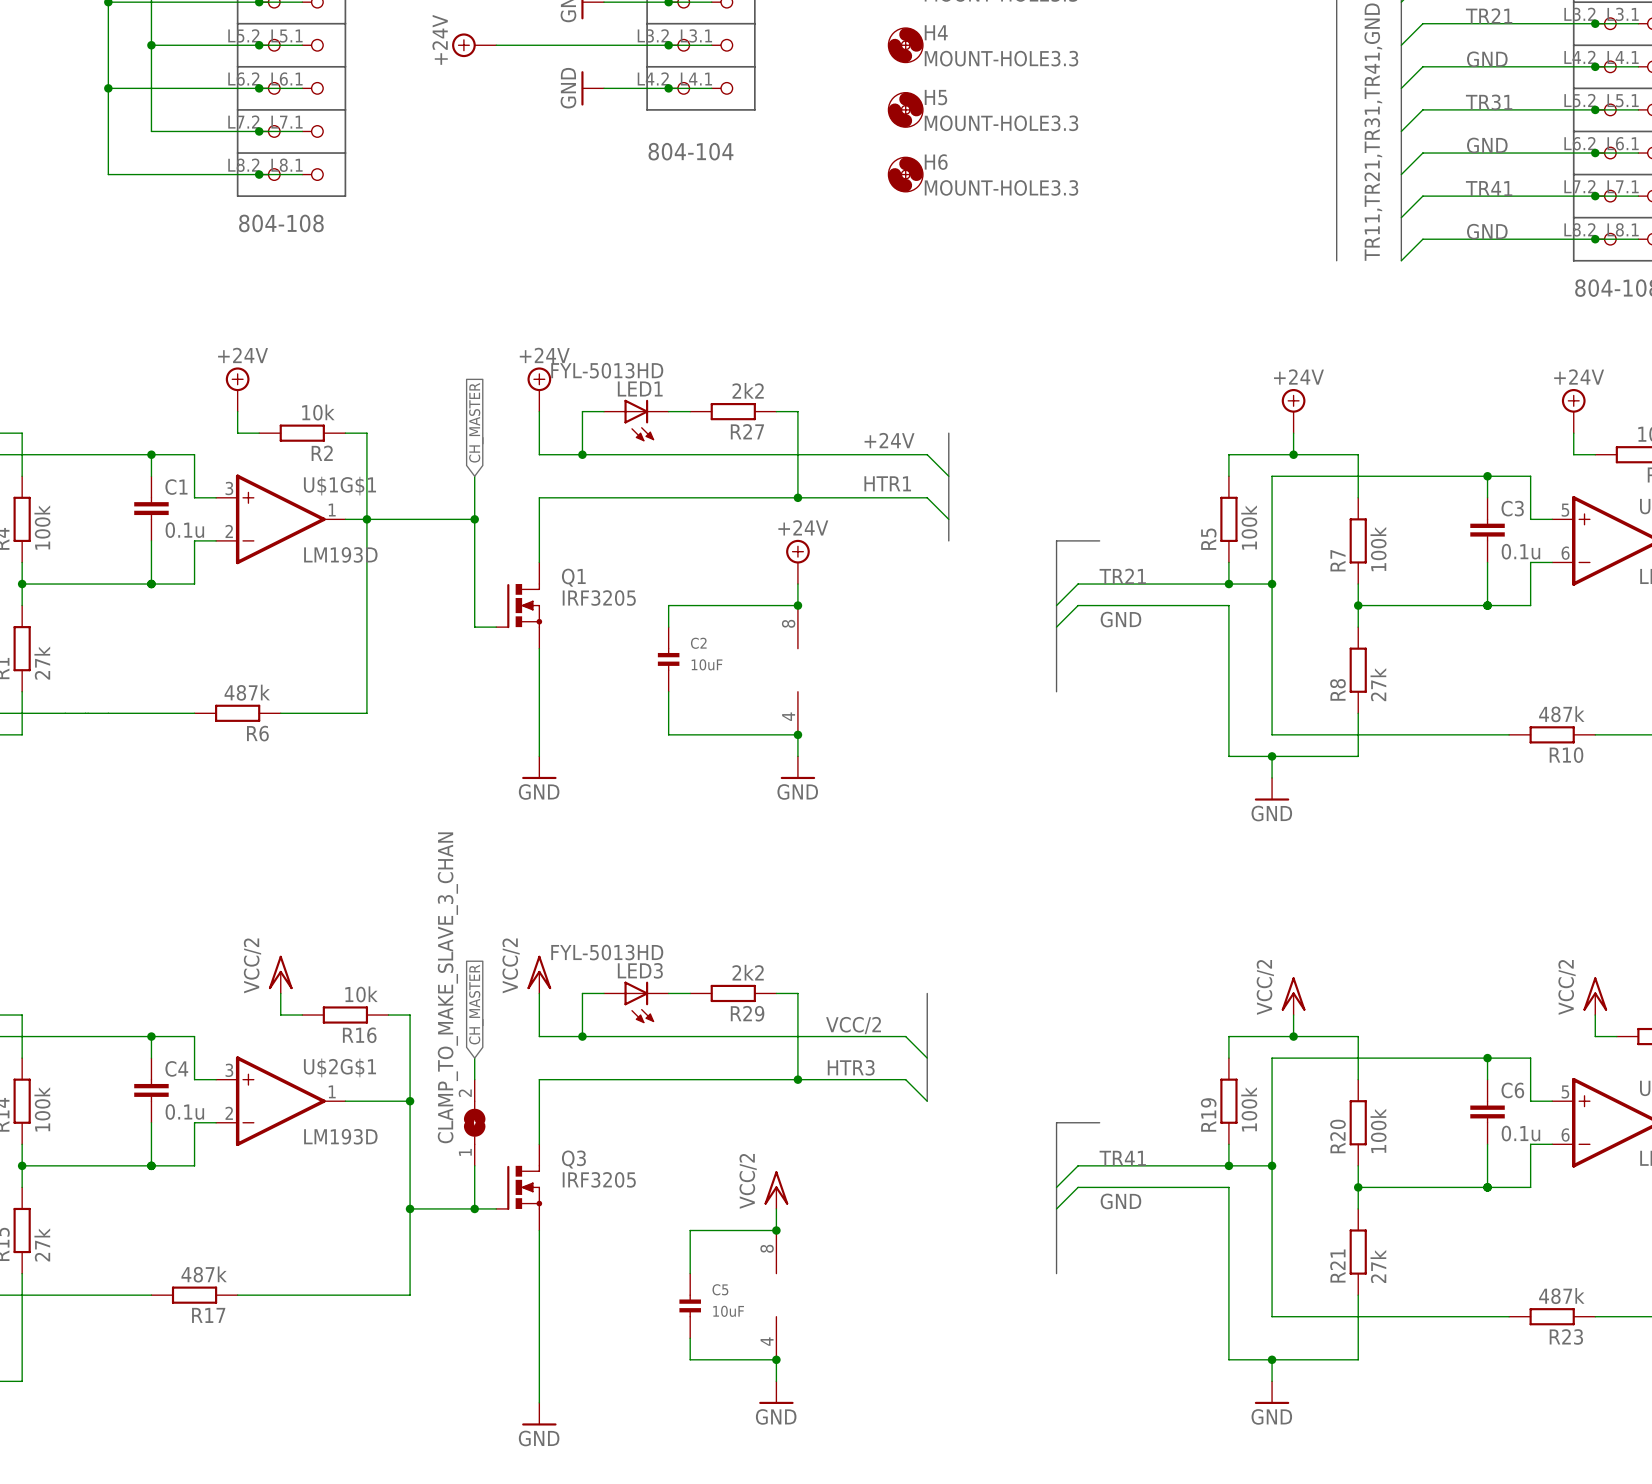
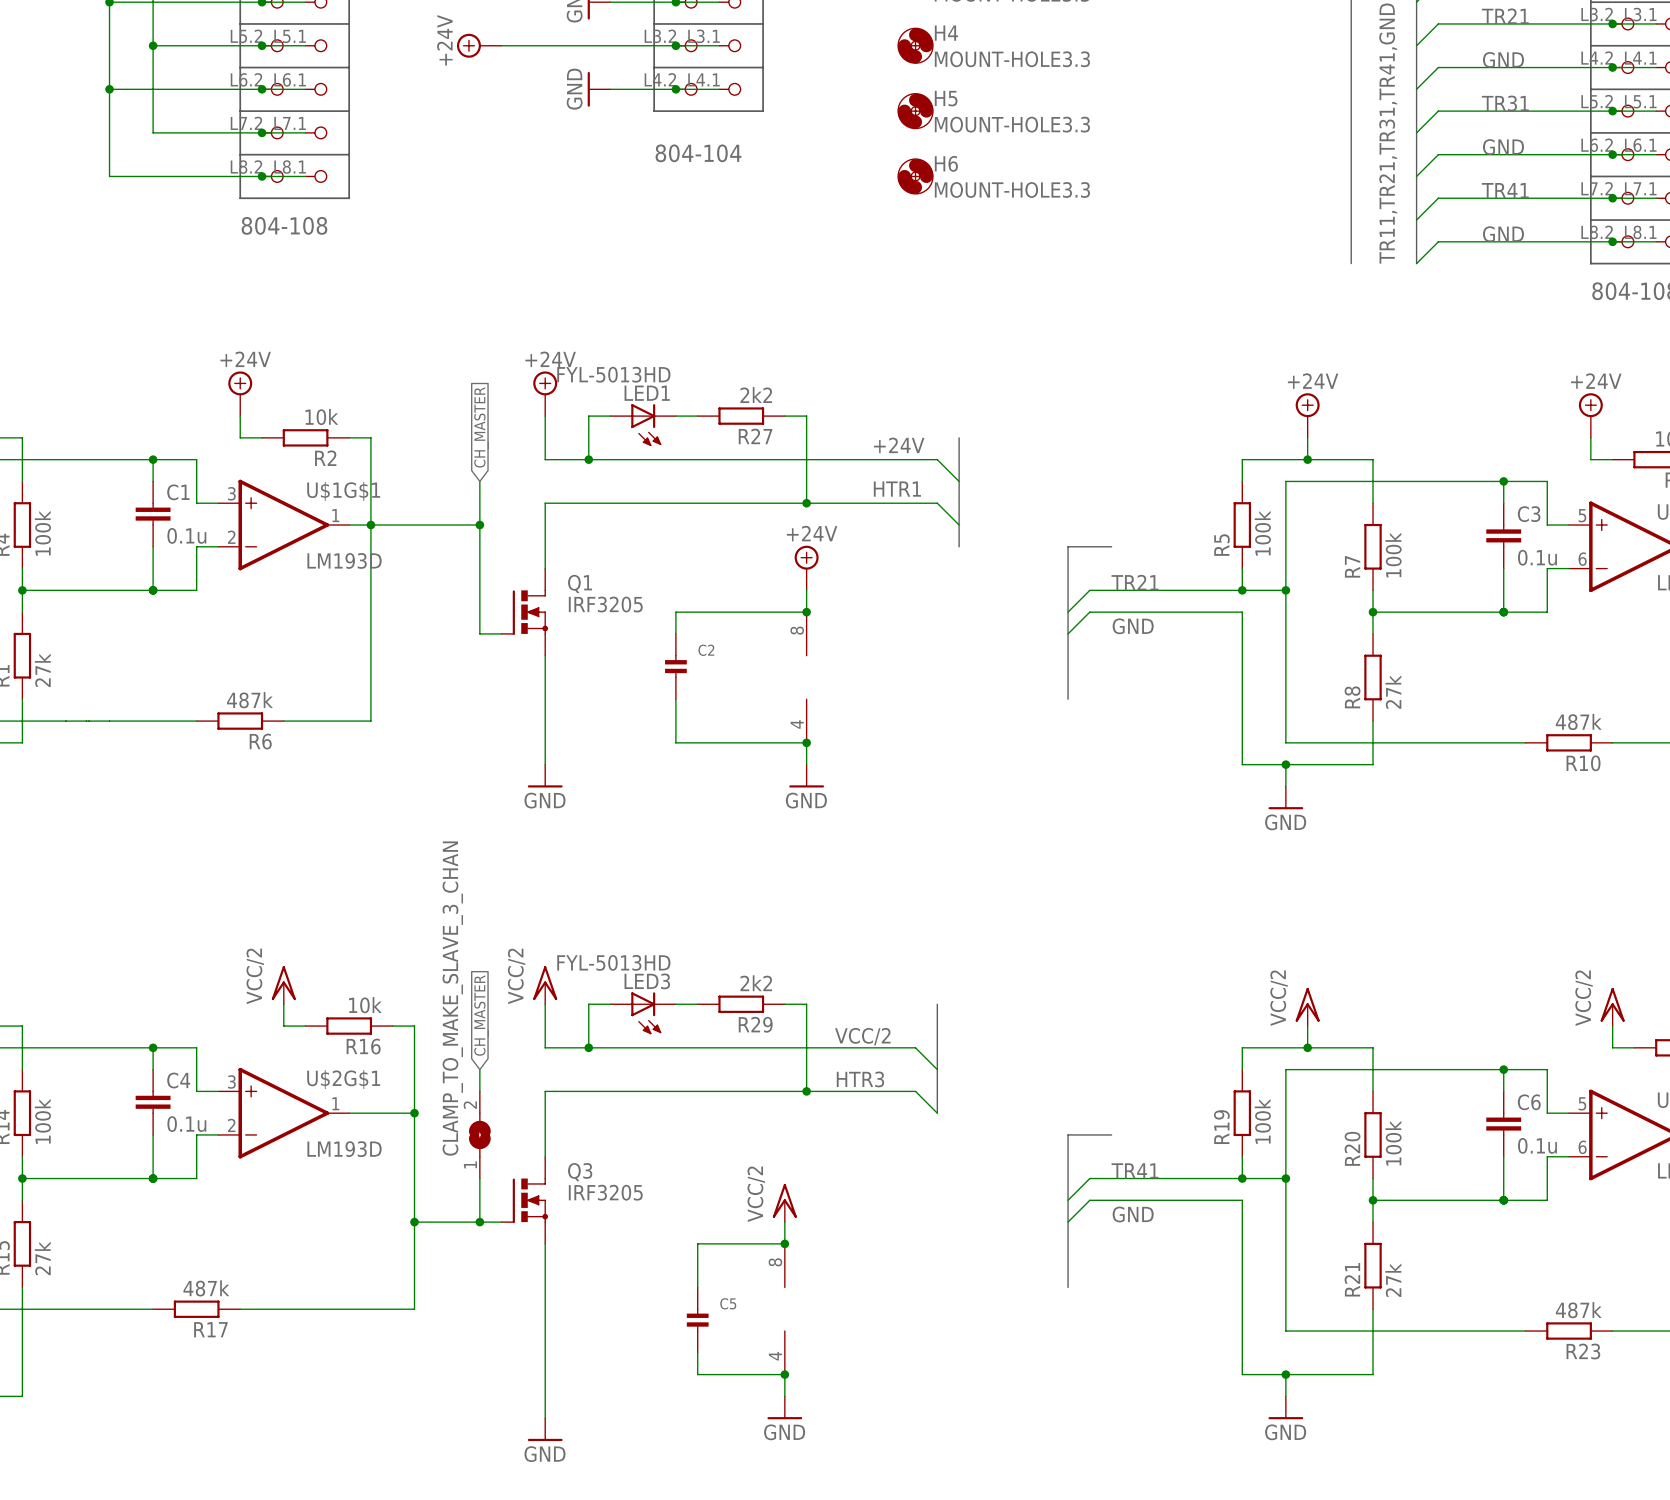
C2 value: 10uF (707, 664) -> none
C5 value: 10uF (728, 1311) -> none

